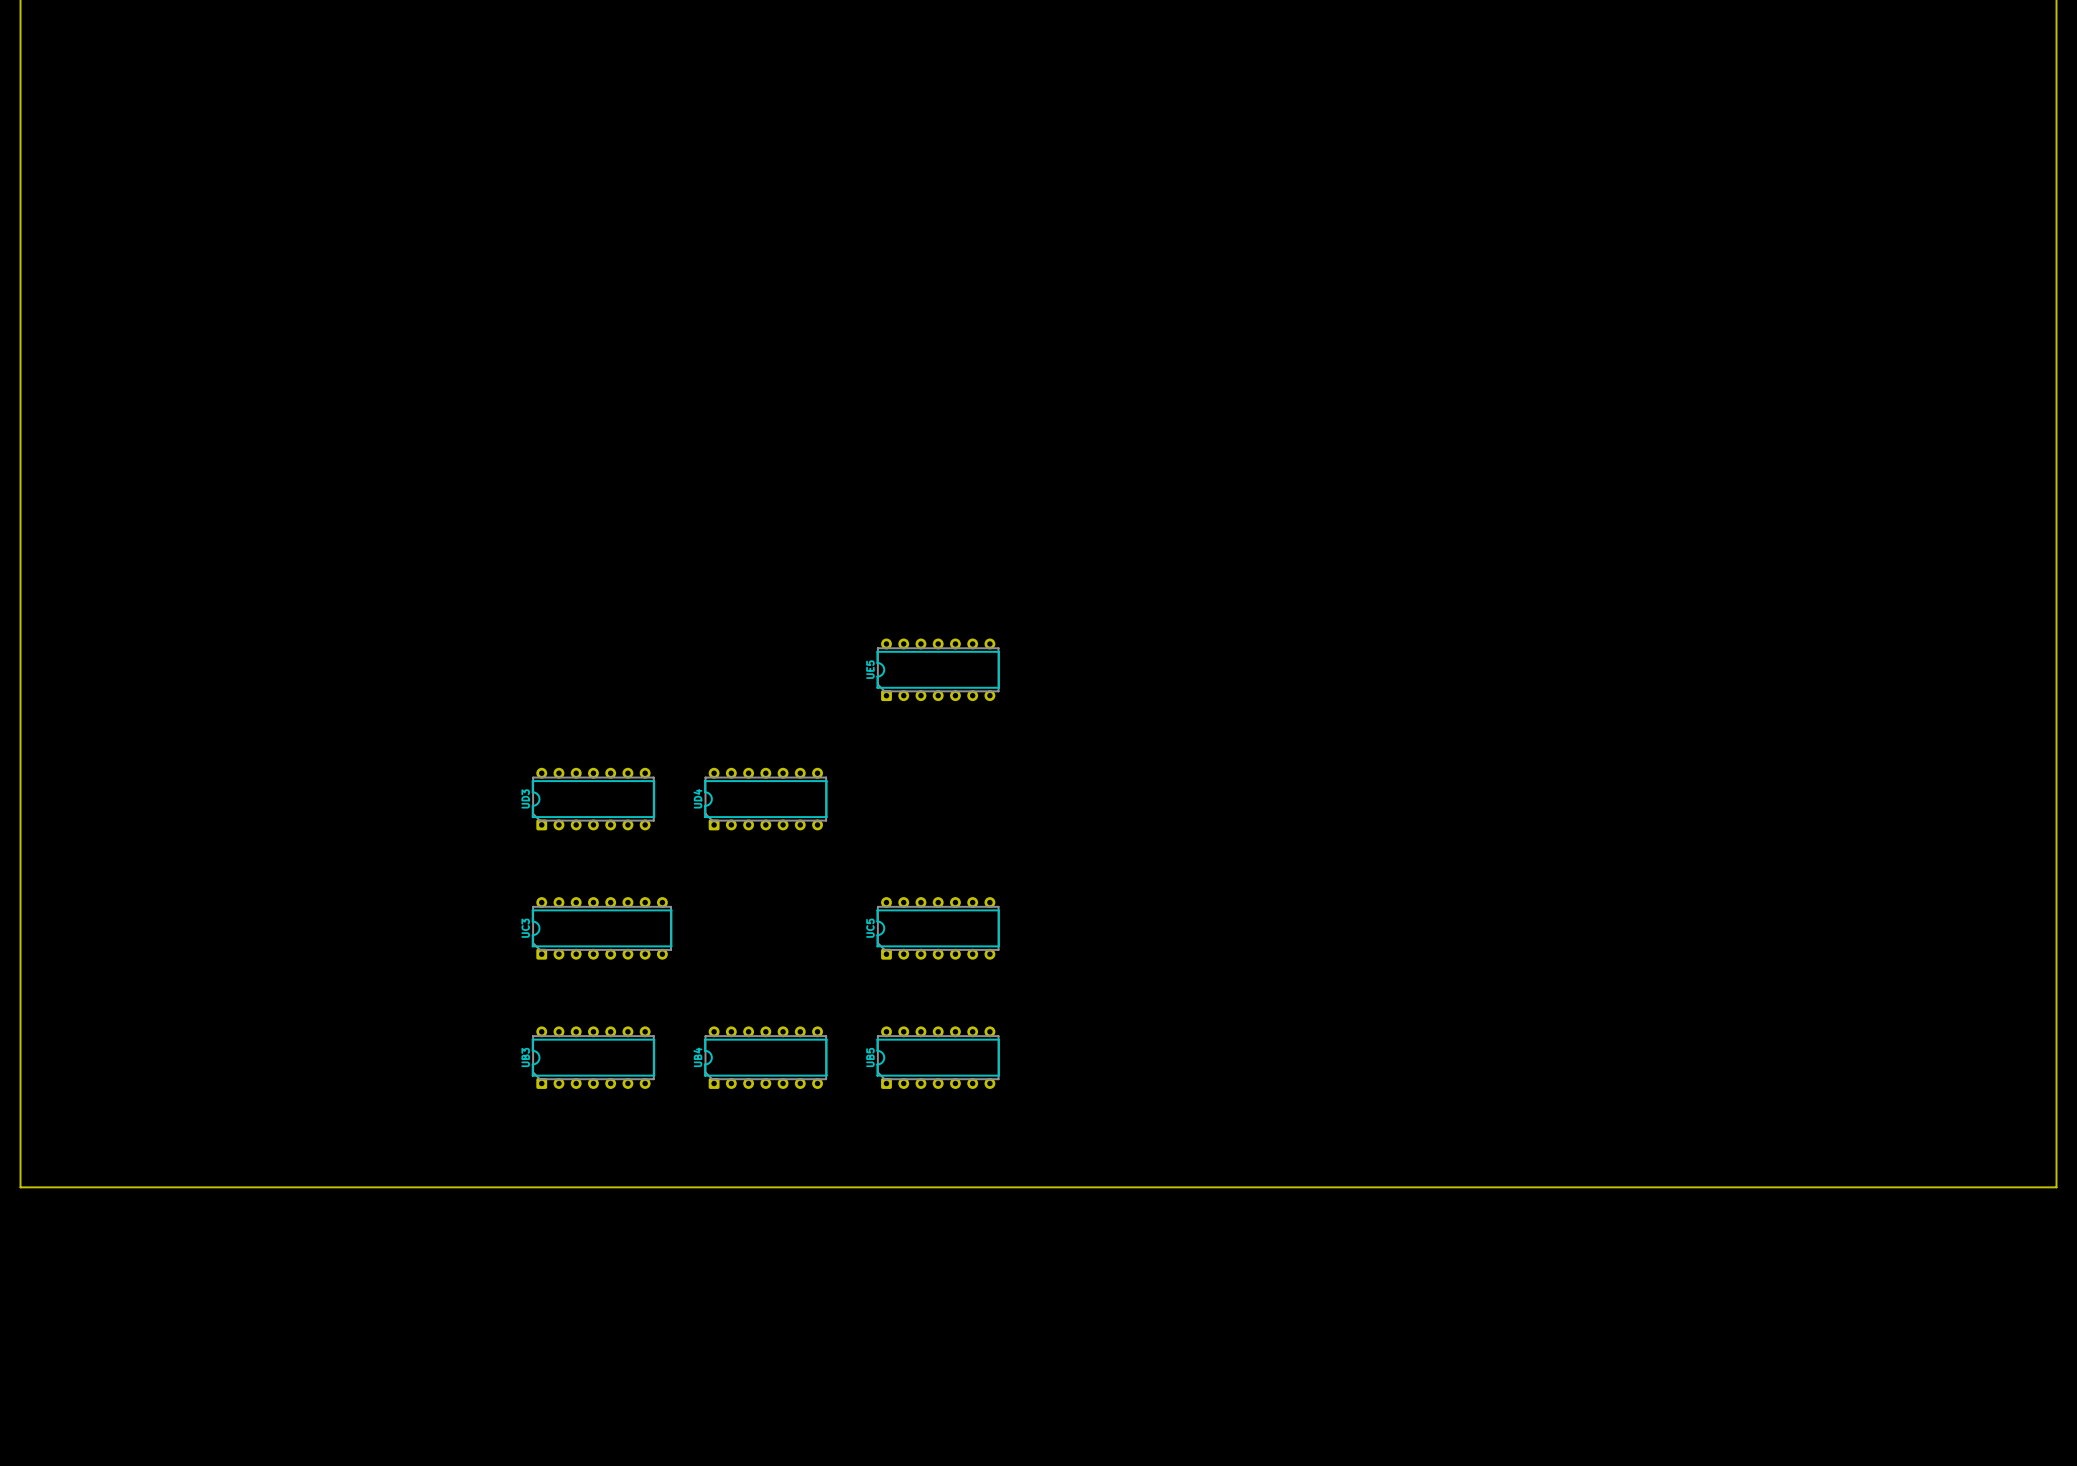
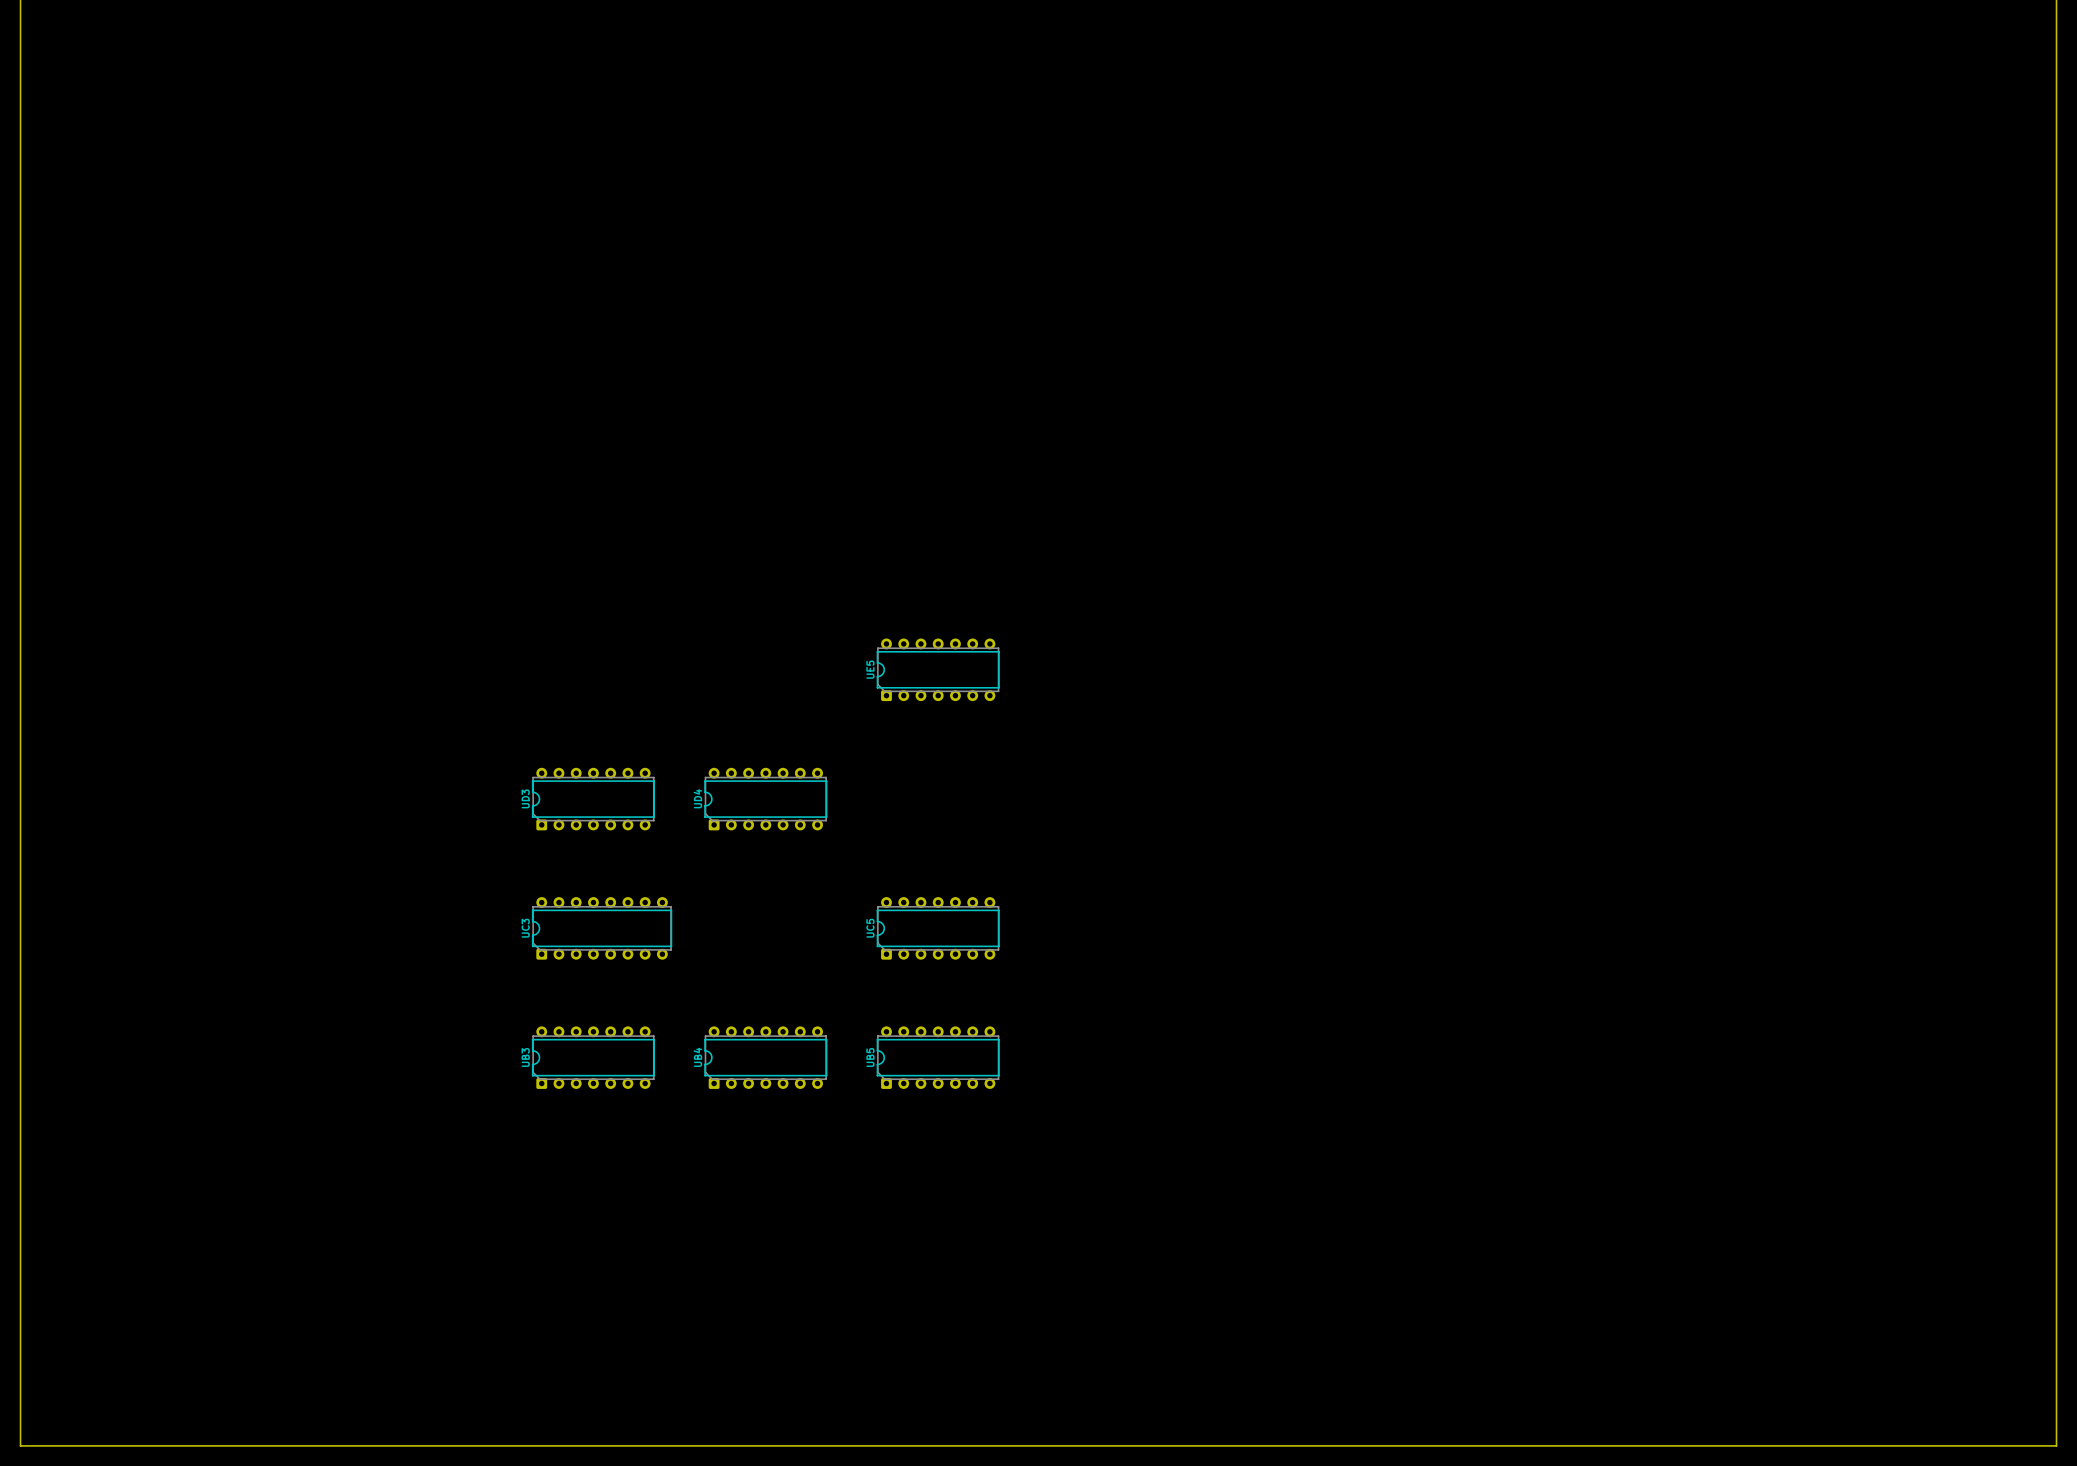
board edge: (20, 1187) (2056, 1187) -> (20, 1187) (20, 1445) (2056, 1445) (2056, 1187)

